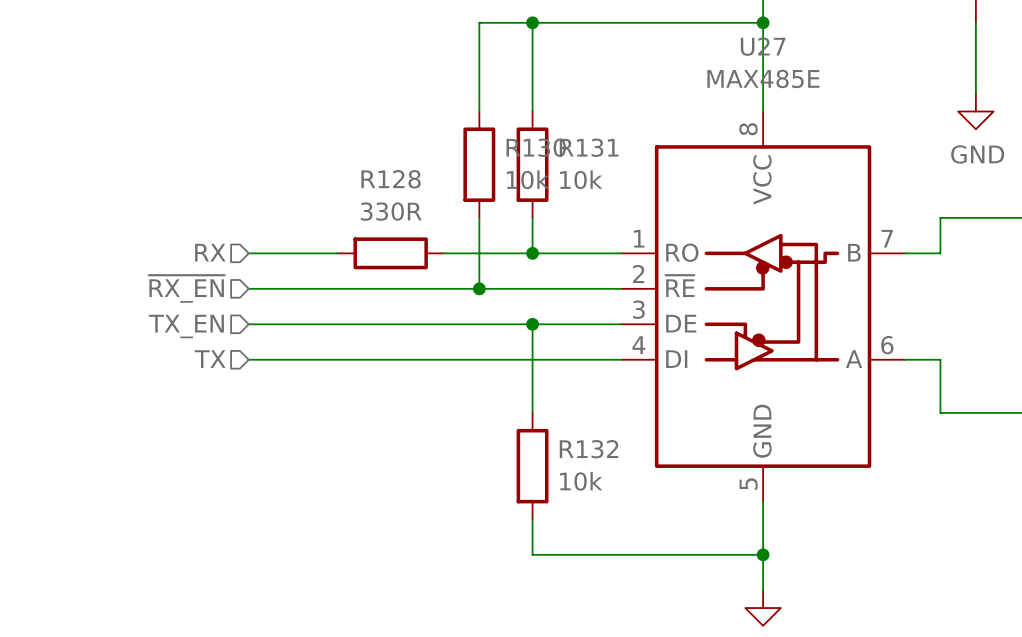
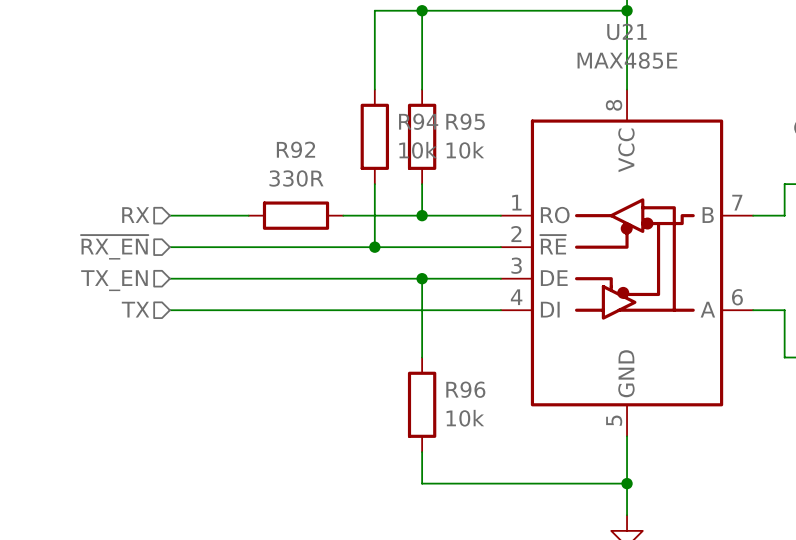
U27 name: U27 (763, 46) -> U21 (626, 31)
R130 name: R130 (536, 147) -> R94 (418, 121)
R131 name: R131 (589, 147) -> R95 (465, 121)
R128 name: R128 (391, 179) -> R92 (295, 149)
R132 name: R132 (589, 449) -> R96 (465, 389)

